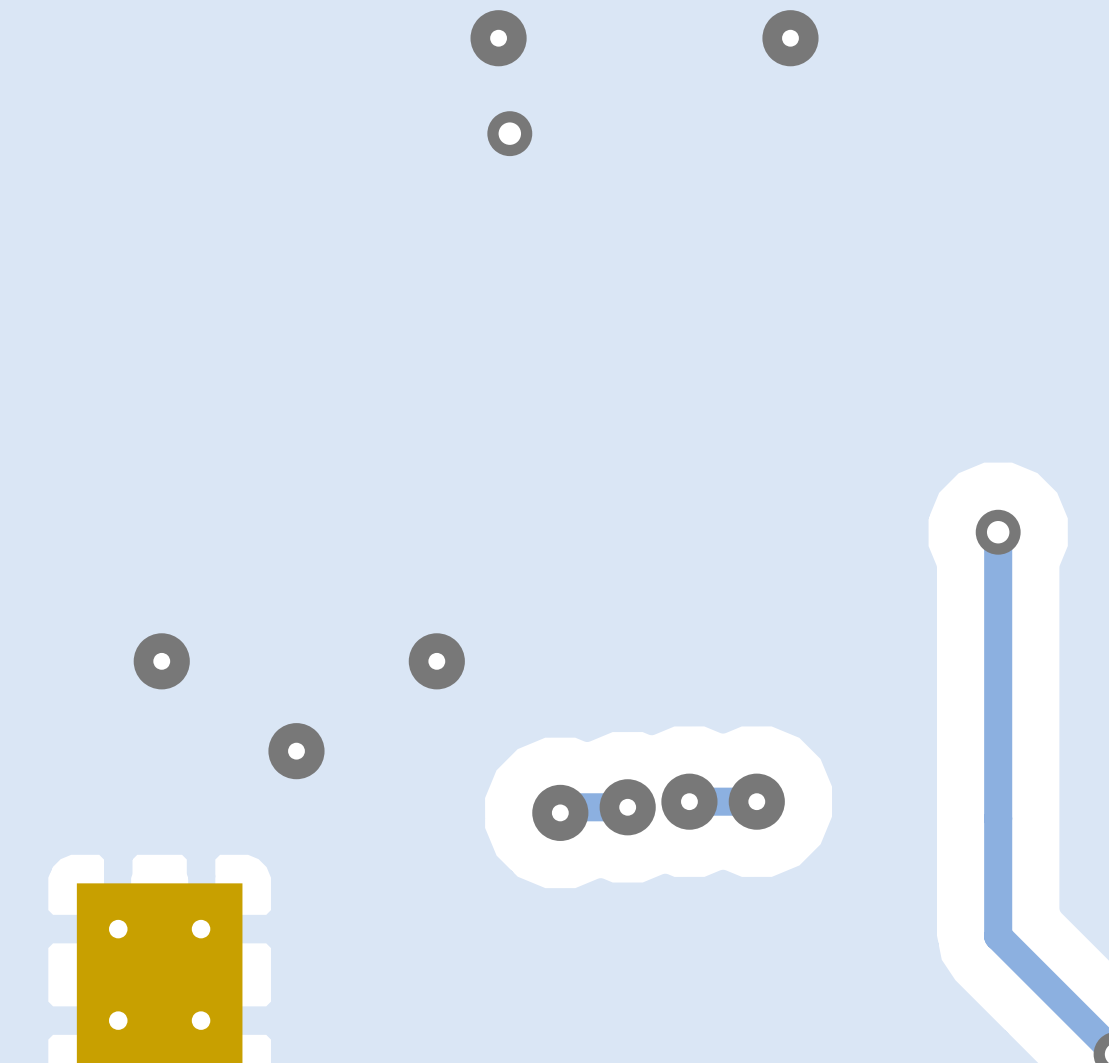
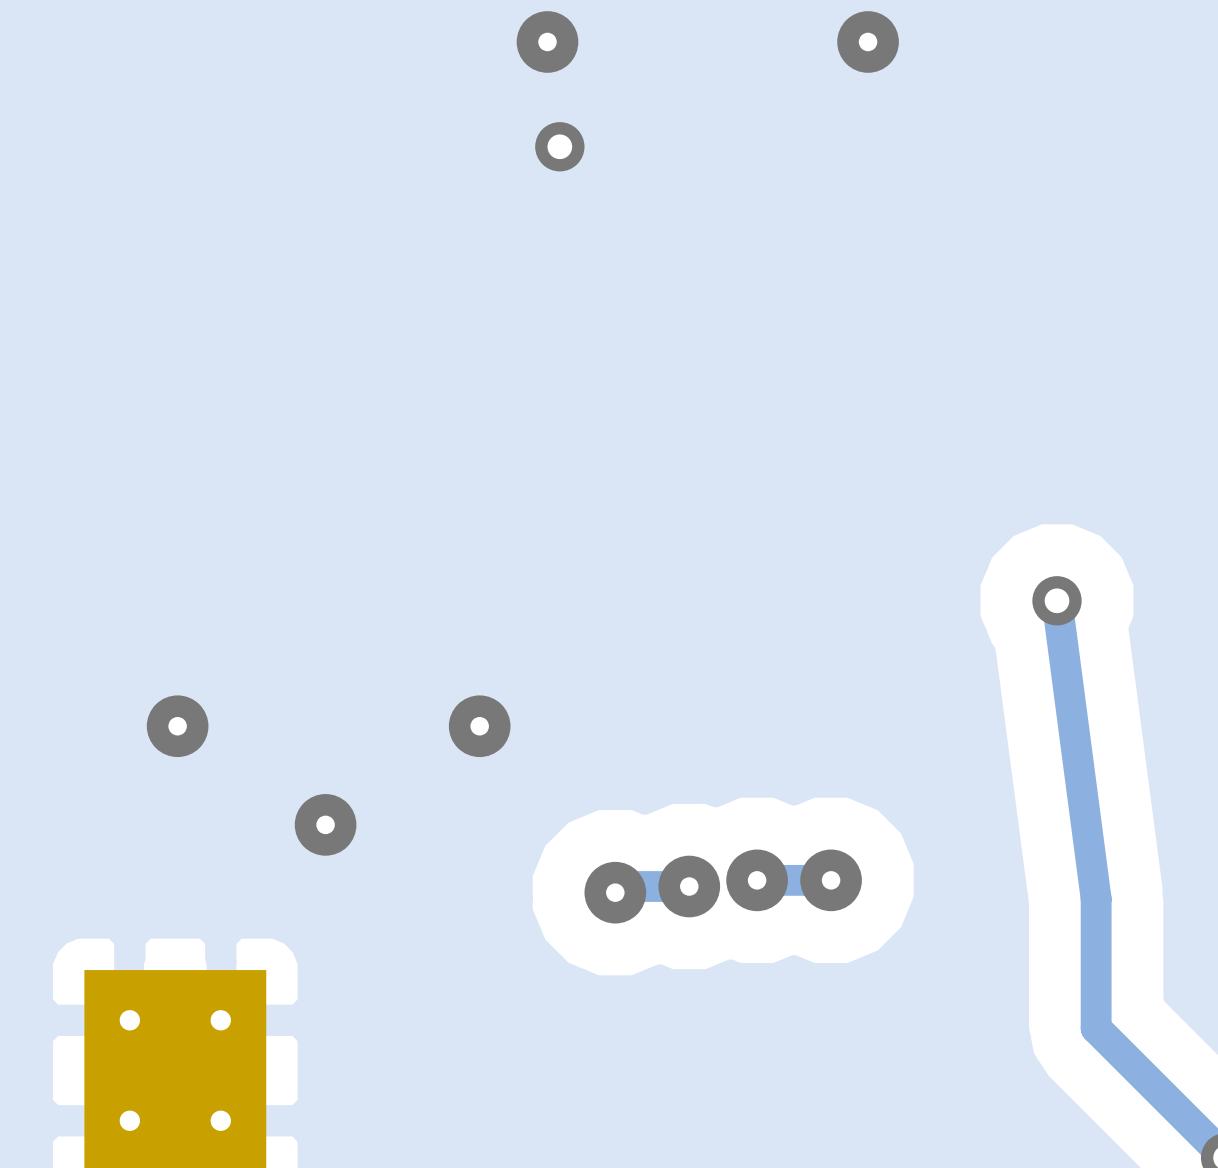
track: (998, 532) (998, 818) -> (1057, 600) (1096, 898)
via position: (998, 532) -> (1057, 600)

